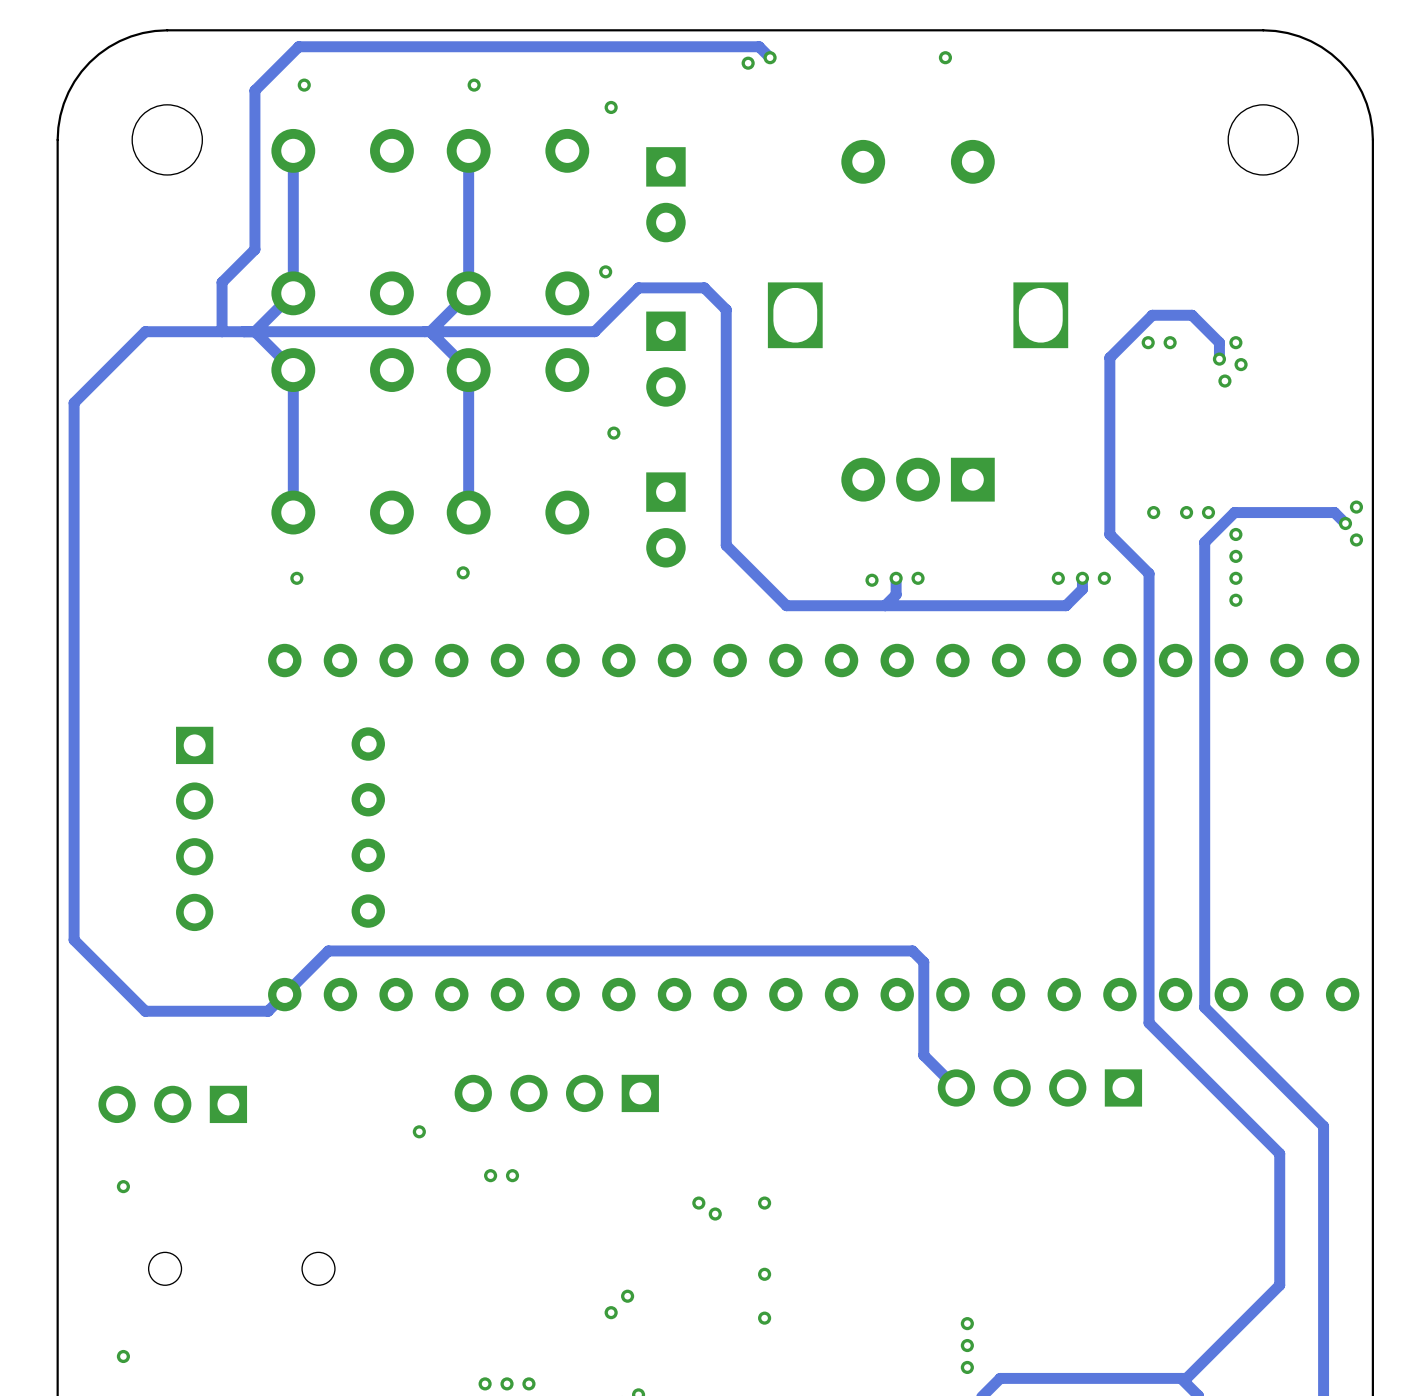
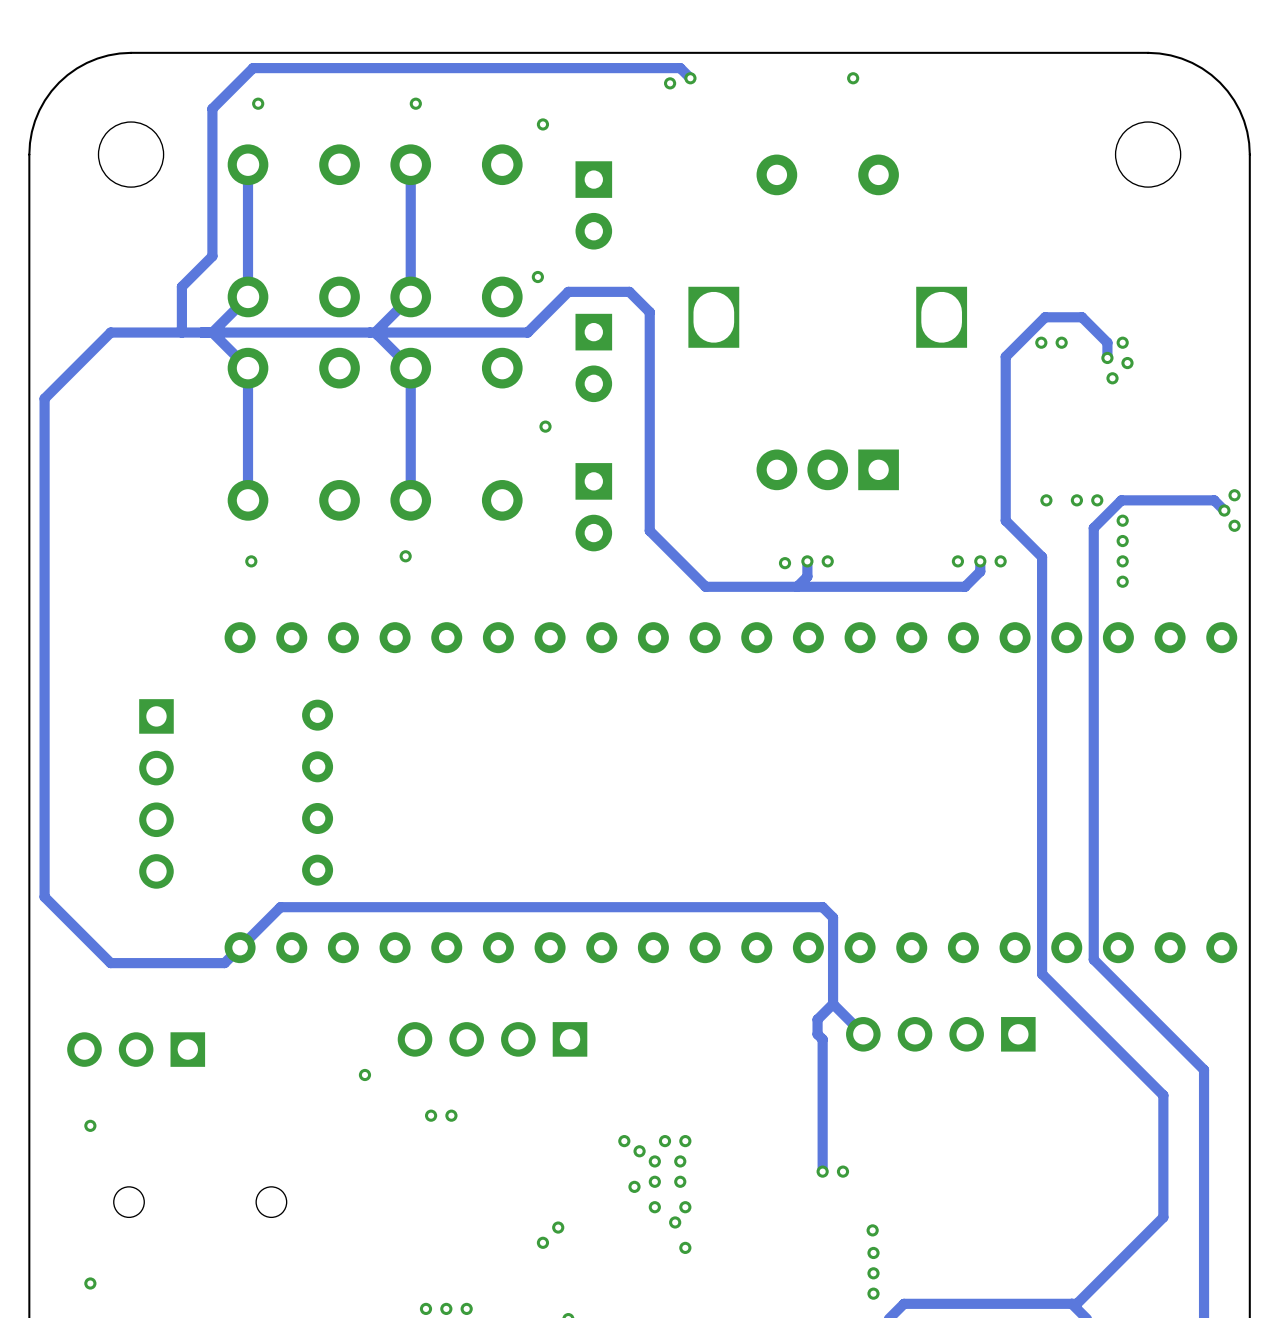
track: none -> (833, 1004) (817, 1019) (817, 1034) (822, 1039) (822, 1171)
via: none -> (665, 1141)
via: none -> (654, 1161)
via: none -> (680, 1161)
via: none -> (822, 1171)
via: none -> (842, 1171)
via: none -> (654, 1181)
via: none -> (680, 1181)
via: none -> (634, 1186)
via: none -> (654, 1207)
via: none -> (675, 1222)
via: none -> (872, 1230)

